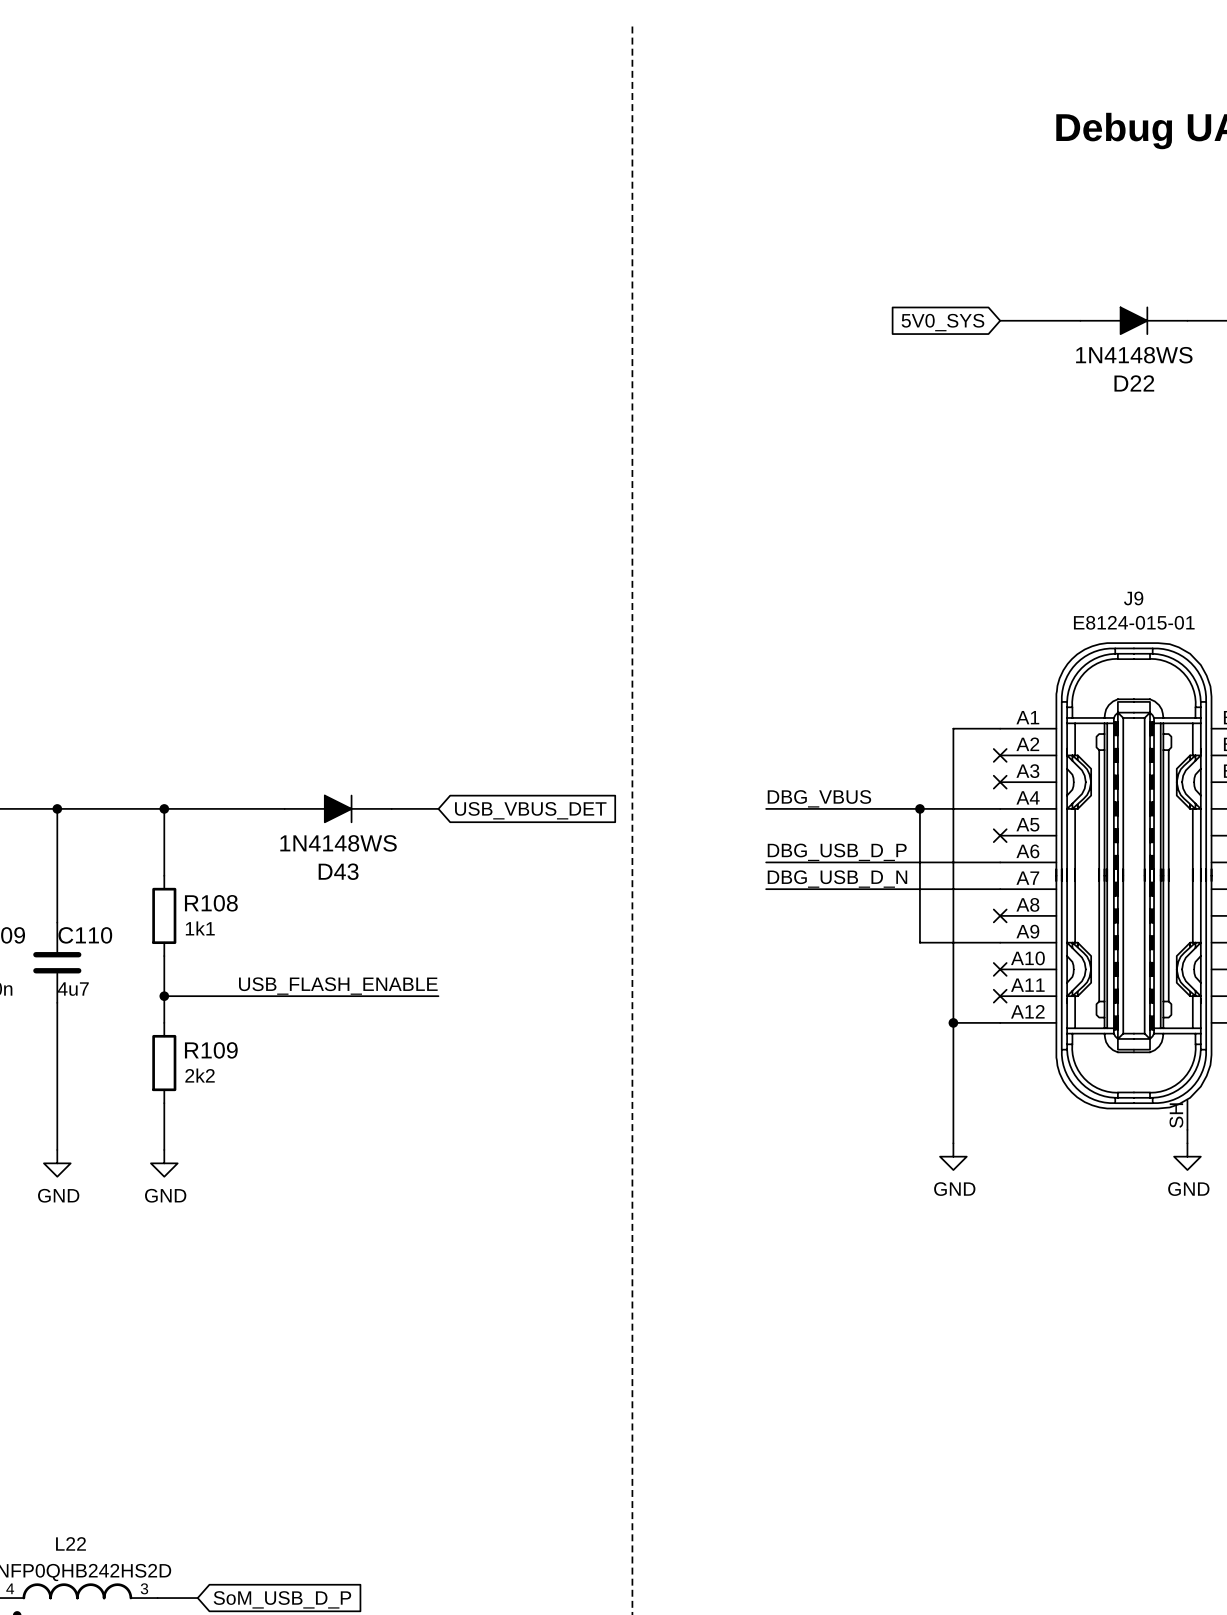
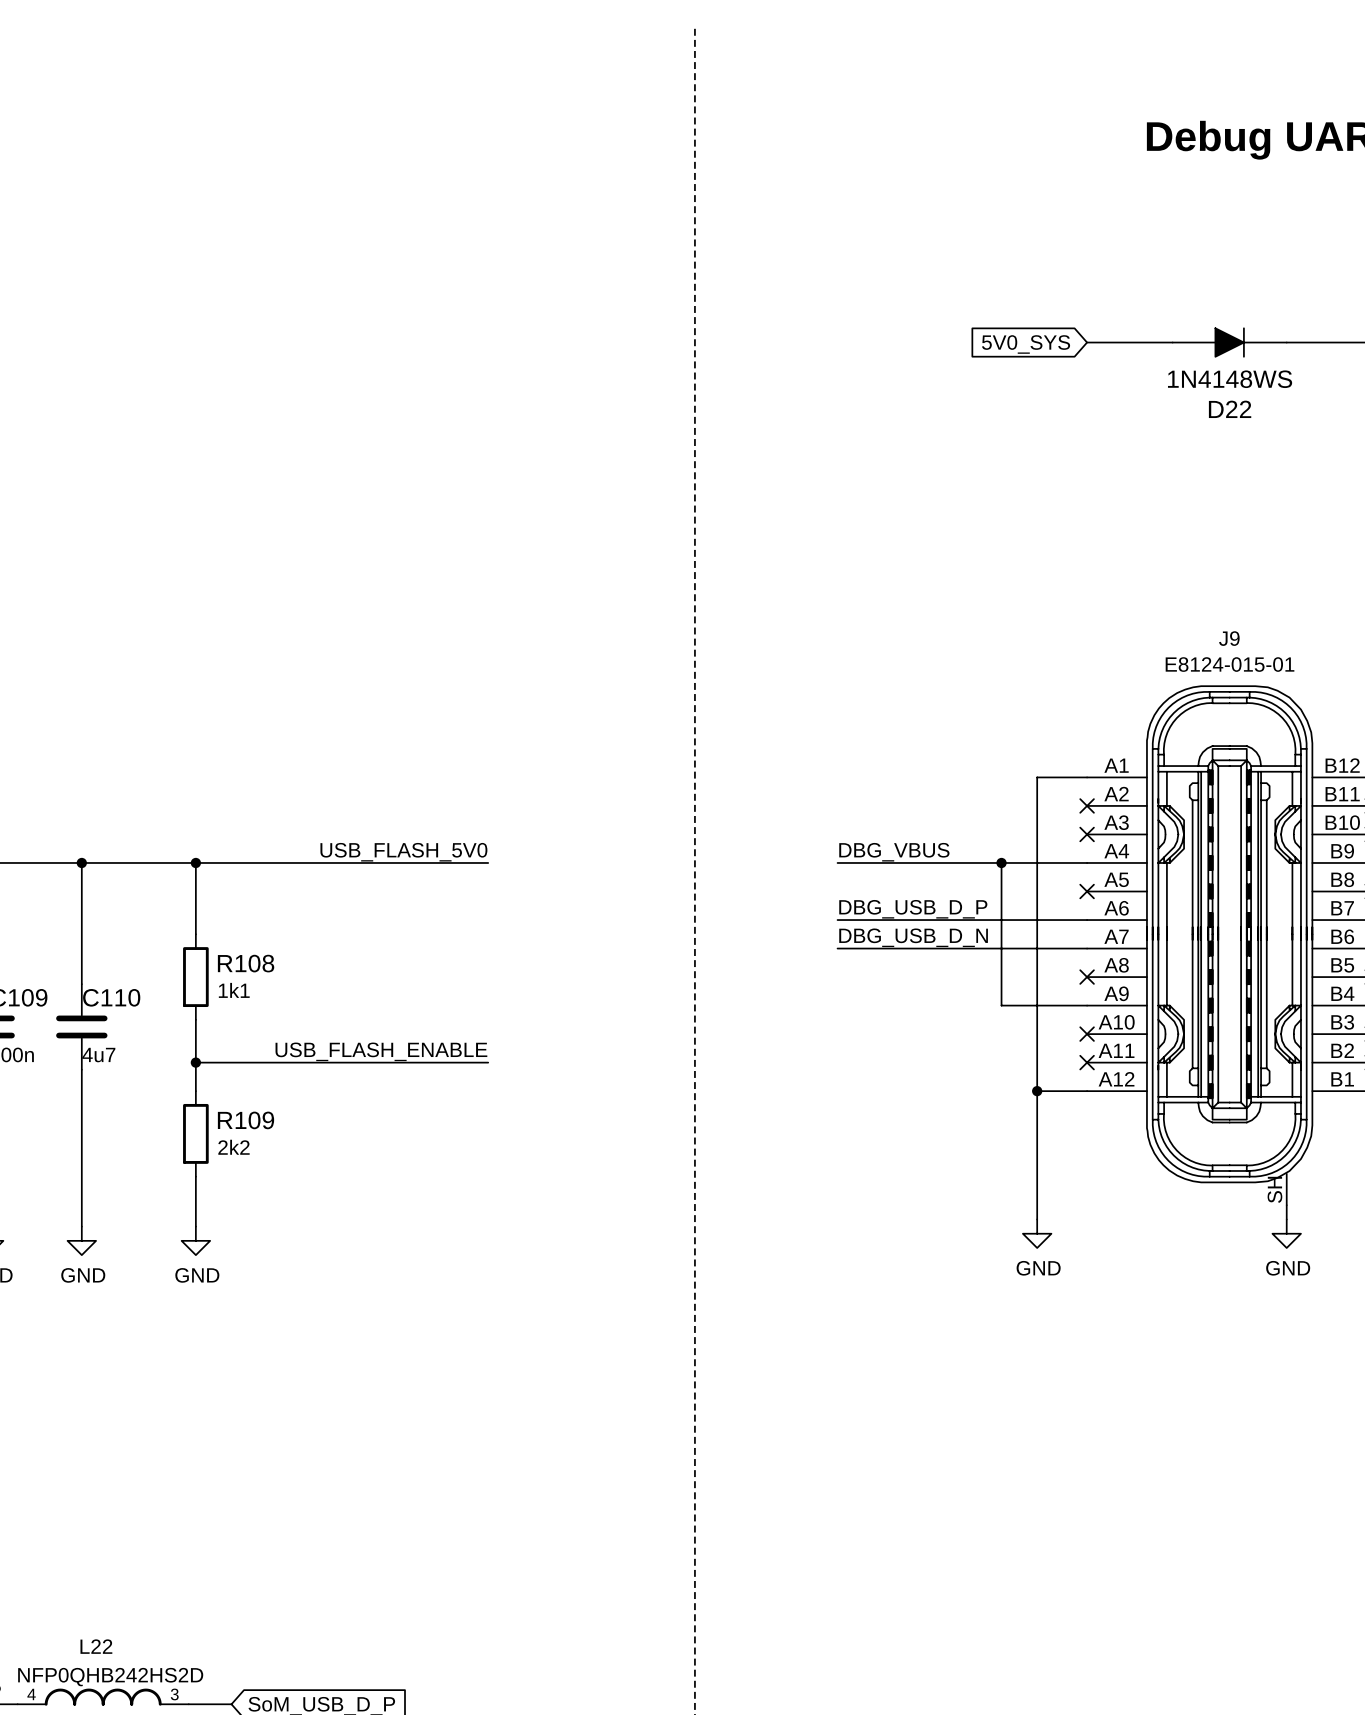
label: none -> USB_FLASH_5V0 (403, 852)
D43: 1N4148WS (338, 808) -> none
global label: USB_VBUS_DET (530, 810) -> none

